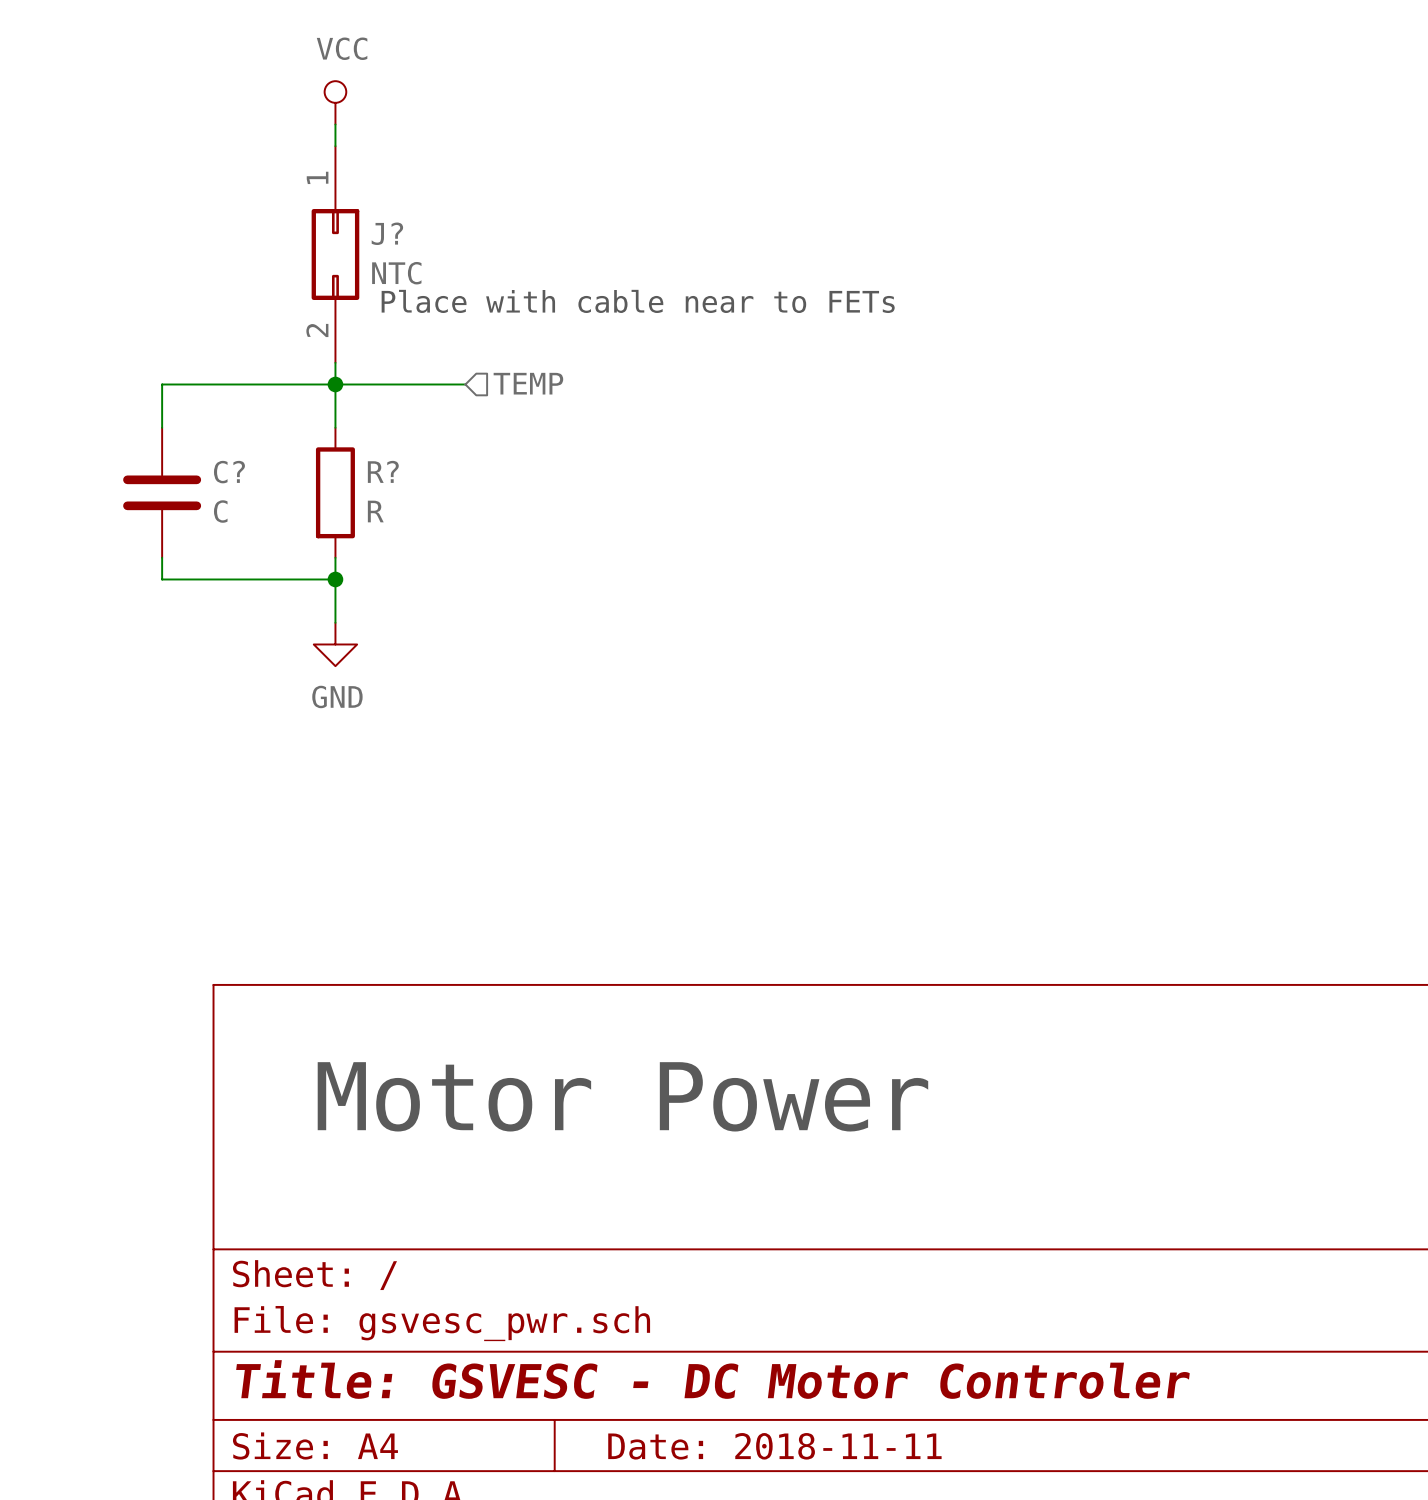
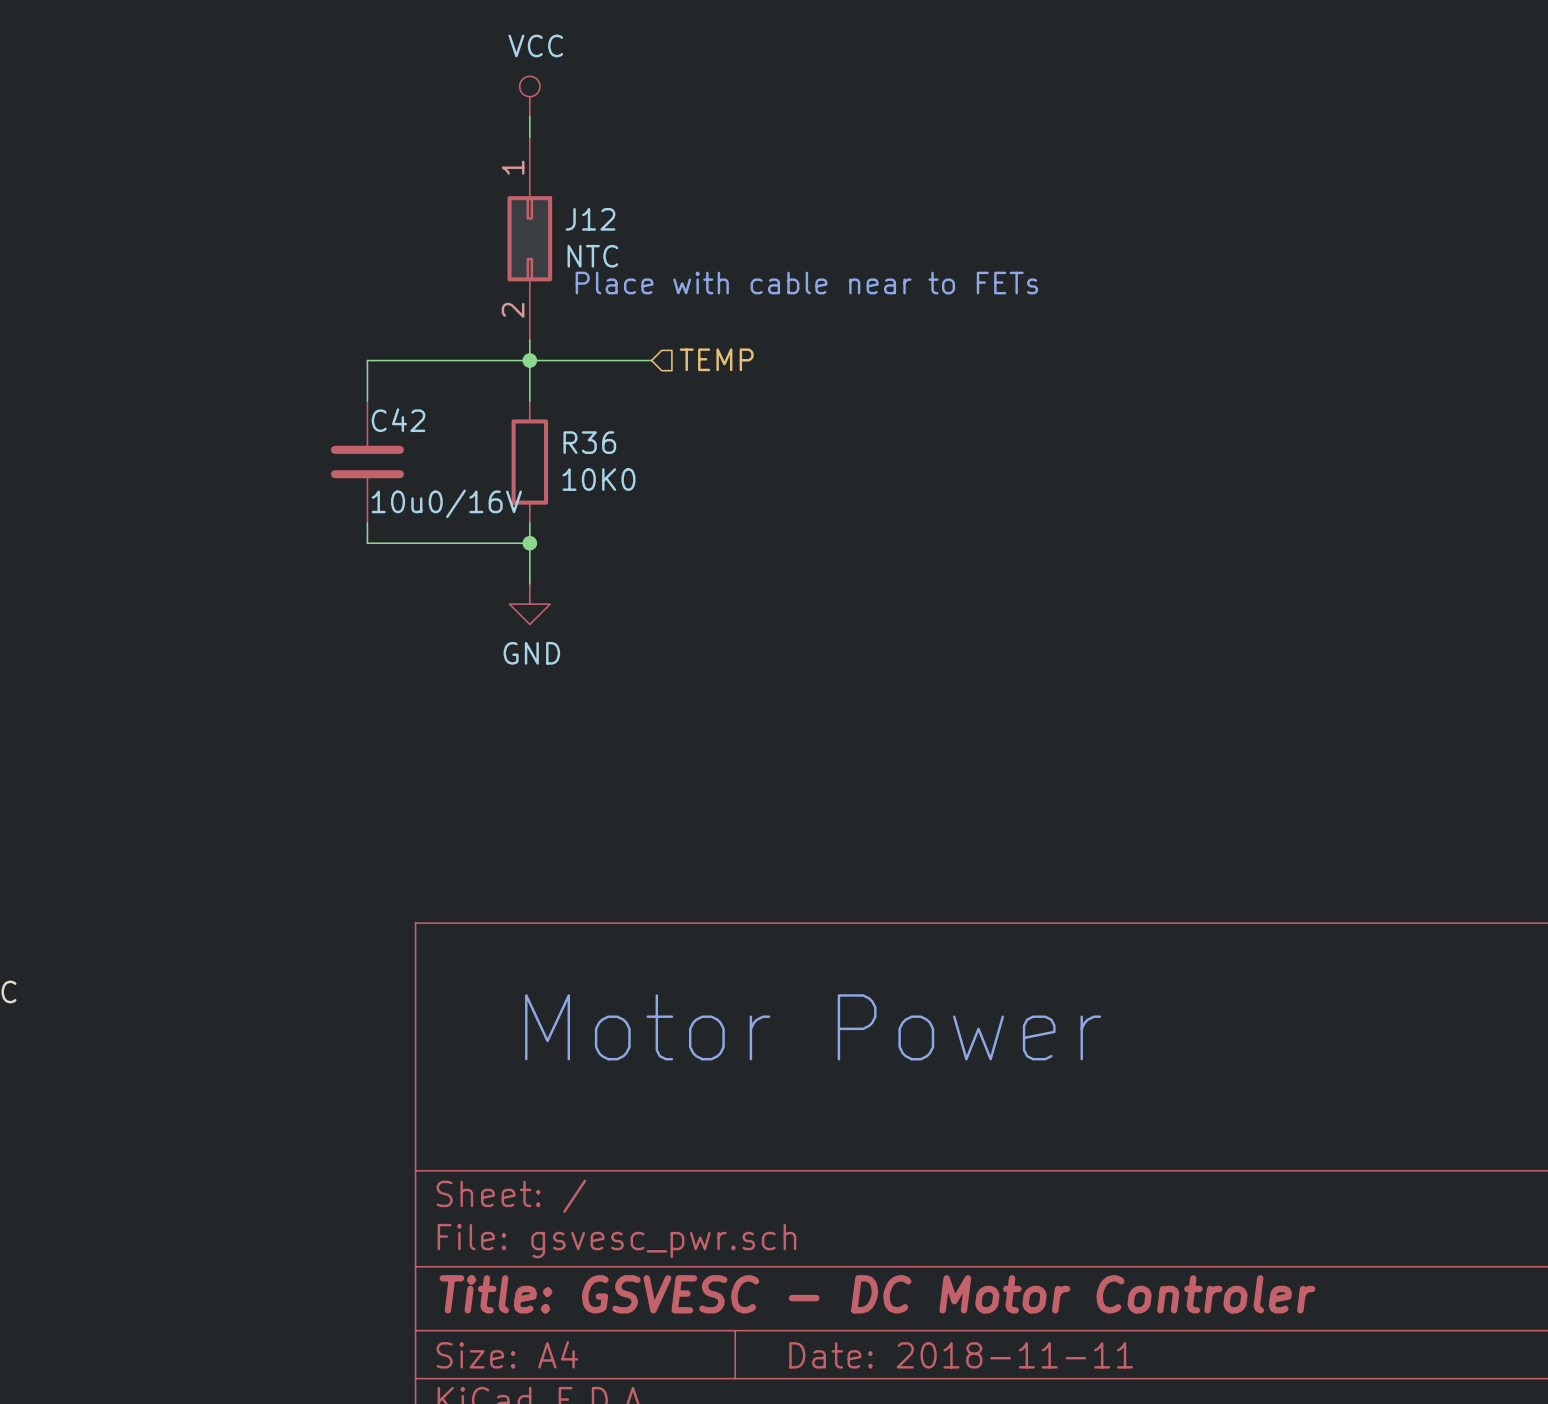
J? name: J? (387, 233) -> J12 (590, 219)
R? name: R? (383, 471) -> R36 (589, 442)
C? name: C? (229, 472) -> C42 (398, 420)
C? value: C (220, 511) -> 10u0/16V (446, 503)
R? value: R (375, 511) -> 10K0 (598, 479)

